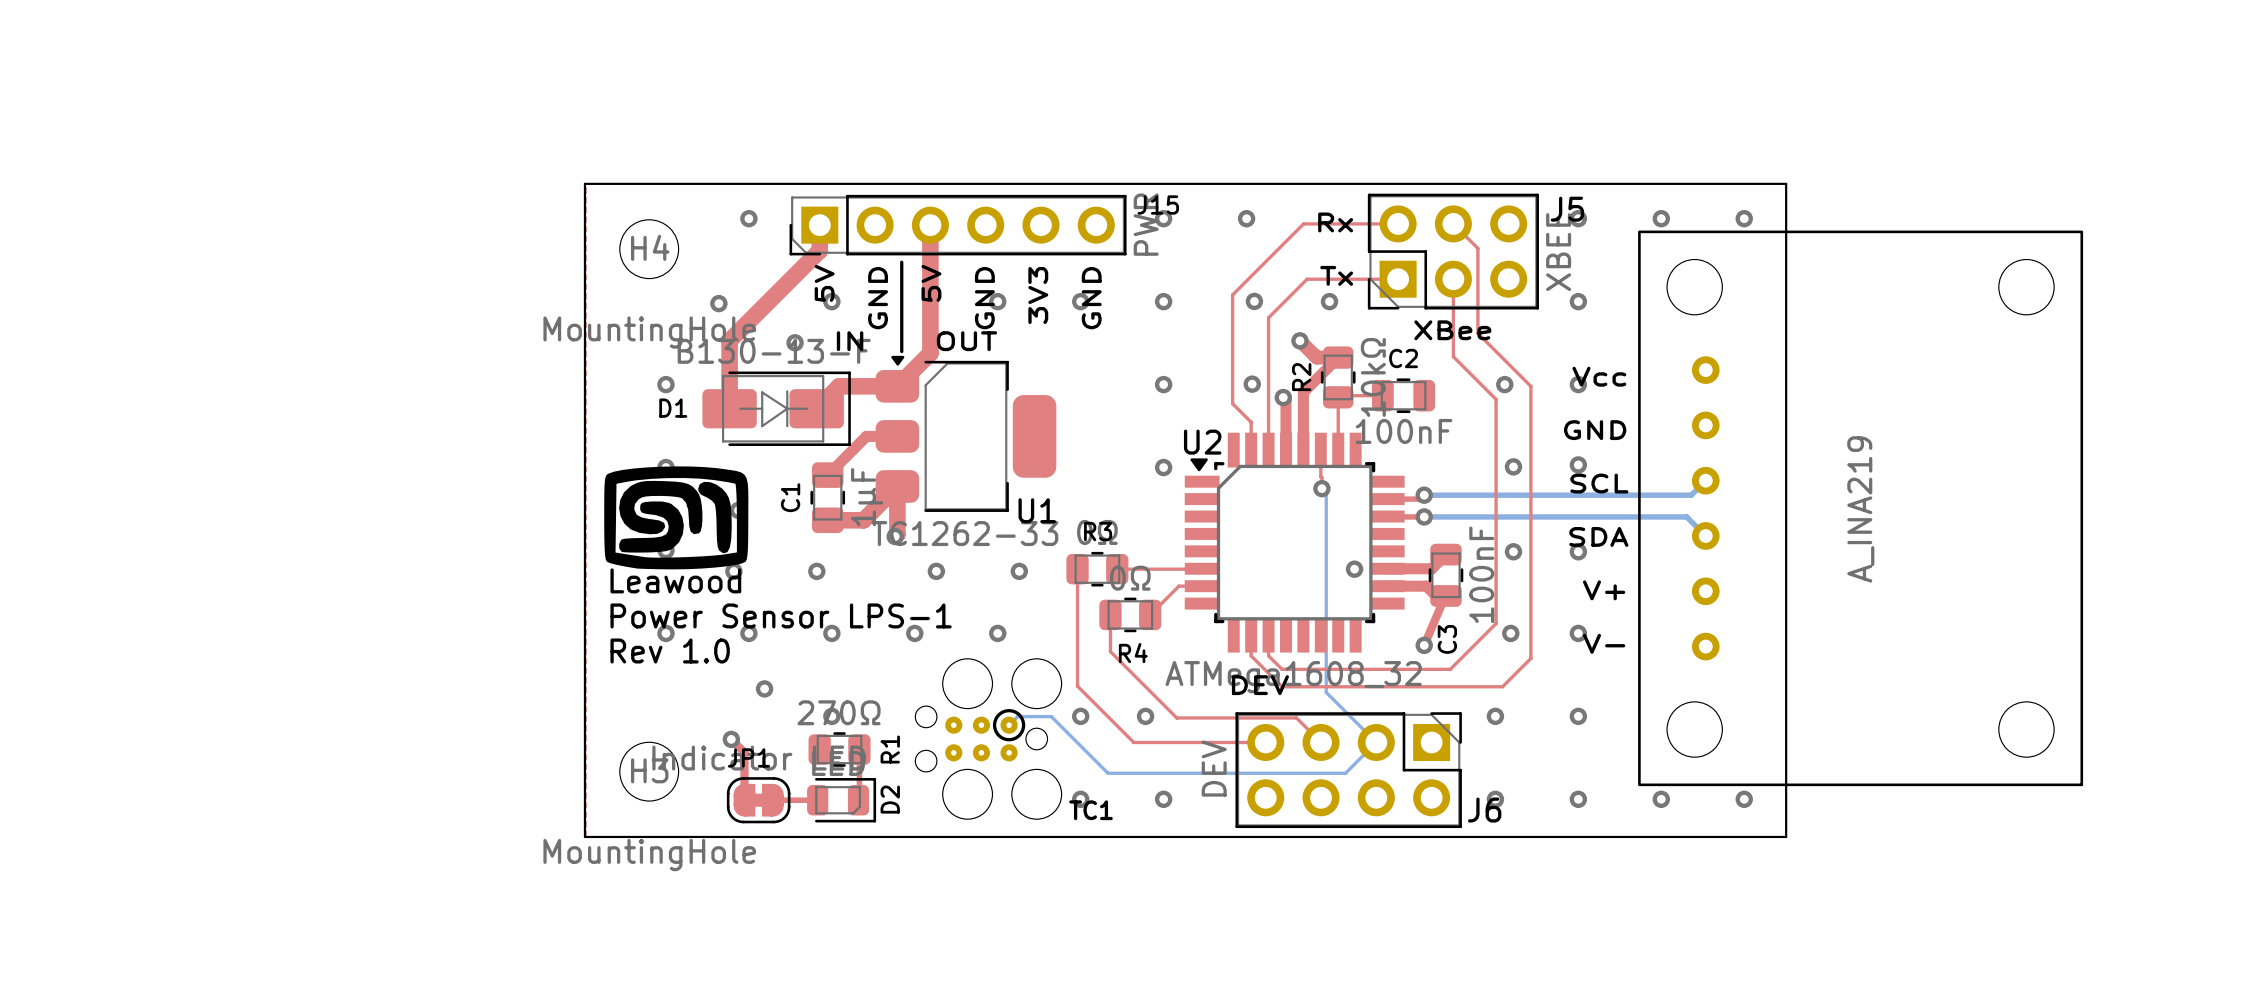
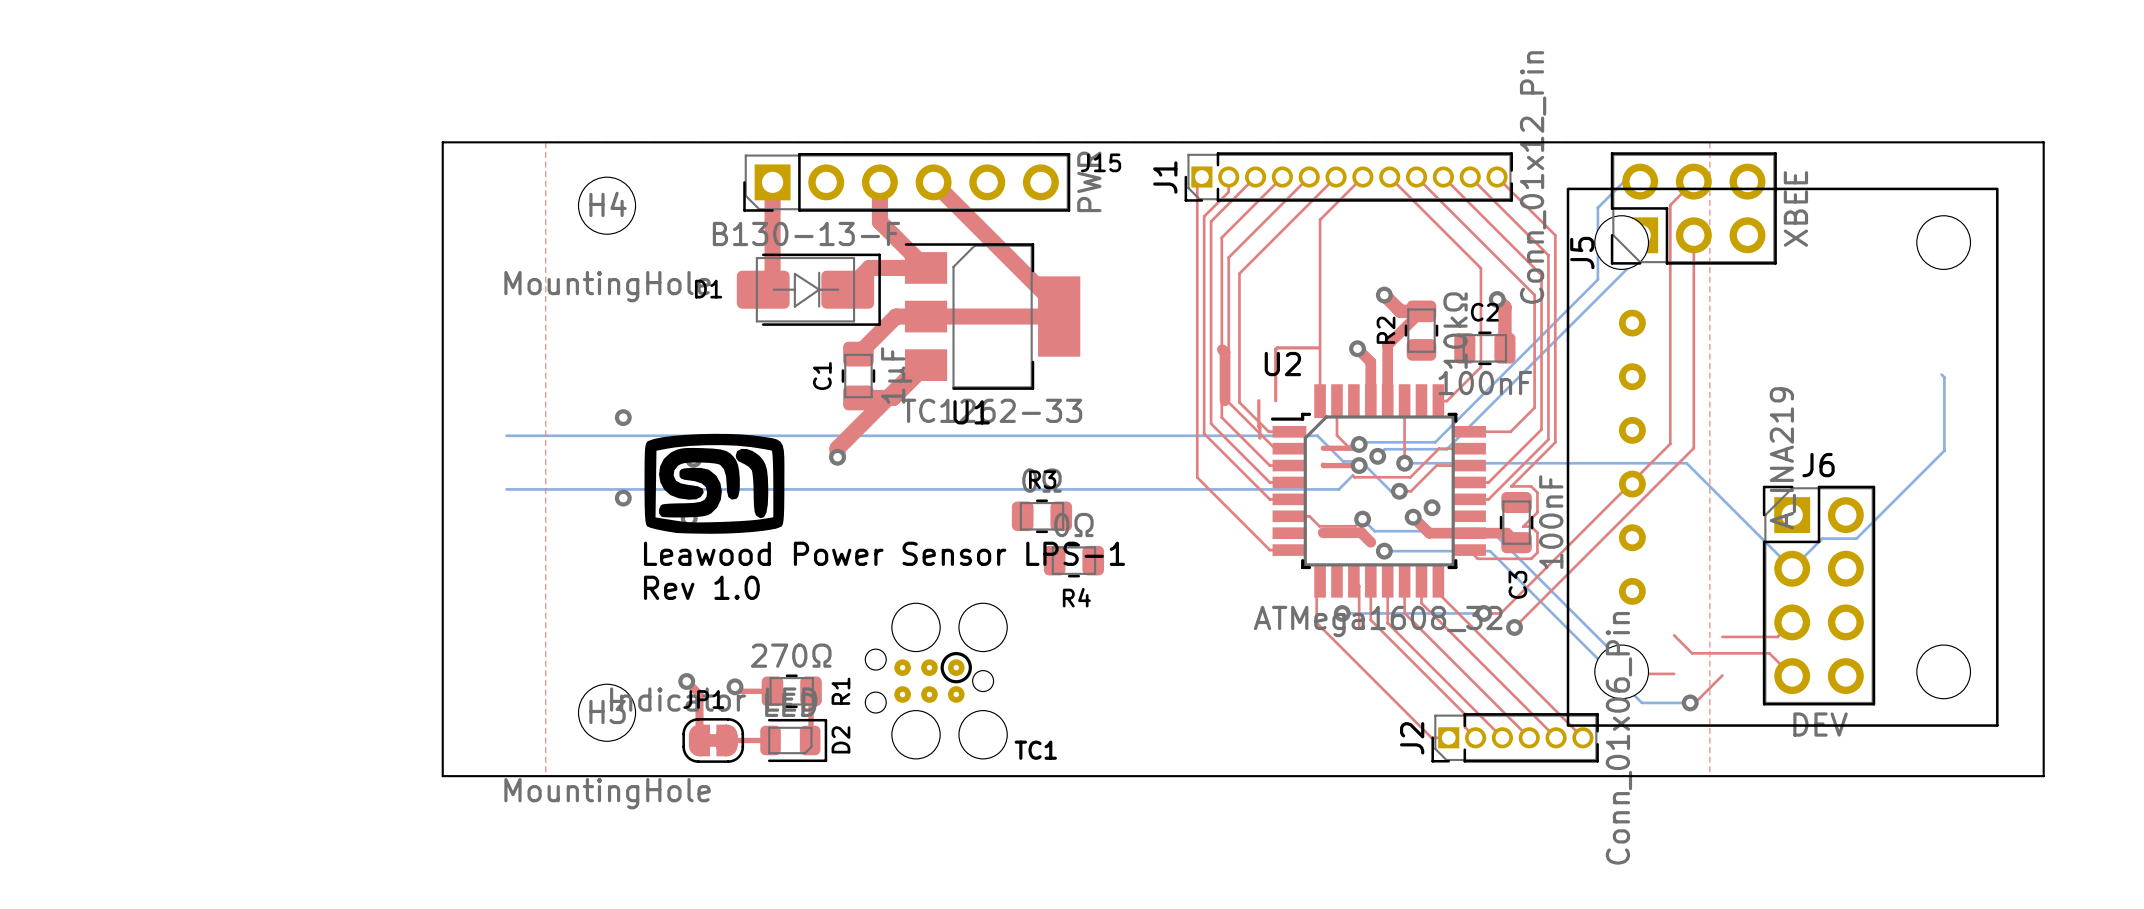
board edge: (584, 183) (584, 836) -> (544, 142) (442, 142) (442, 776) (544, 776)
board edge: (1786, 183) (1786, 836) -> (1710, 142) (2043, 142) (2043, 776) (1710, 776)
J5 name rotation: 0° (1567, 209) -> 90° counterclockwise (1582, 253)
J5 name position: J5 (1567, 209) -> J5 (1582, 253)
via: (748, 218) -> none
via: (1163, 218) -> none
via: (1246, 218) -> none
via: (1578, 218) -> none
via: (1661, 218) -> none
via: (1744, 218) -> none
top track: none -> (1201, 177) (1197, 181) (1197, 477) (1269, 550) (1289, 550)
top track: none -> (1228, 177) (1228, 191) (1204, 216) (1204, 433) (1269, 499) (1289, 499)
top track: none -> (1255, 177) (1211, 221) (1211, 423) (1269, 482) (1289, 482)
top track: none -> (1282, 177) (1221, 237) (1221, 417) (1269, 465) (1289, 465)
top track: none -> (1309, 177) (1228, 257) (1228, 402) (1274, 448) (1289, 448)
top track: none -> (1336, 177) (1239, 273) (1239, 402) (1268, 431) (1289, 431)
J1: none -> Conn_01x12_Pin (1348, 177)
top track: none -> (1362, 177) (1320, 219) (1320, 401)
top track: none -> (1389, 177) (1480, 268) (1480, 367) (1446, 401) (1438, 401)
top track: none -> (1416, 177) (1534, 295) (1534, 407) (1510, 431) (1469, 431)
top track: none -> (1443, 177) (1541, 275) (1541, 429) (1488, 482) (1469, 482)
top track: none -> (1470, 177) (1548, 255) (1548, 439) (1488, 499) (1469, 499)
top track: none -> (1497, 177) (1555, 235) (1555, 442) (1511, 486) (1531, 486) (1537, 492) (1537, 512) (1523, 526) (1531, 526) (1537, 532) (1537, 552) (1531, 558) (1477, 558) (1469, 550)
text: Rx (1335, 222) -> none
top track: (1398, 223) (1303, 223) (1232, 294) (1232, 403) (1251, 422) (1251, 450) -> none
top track: (1453, 223) (1477, 248) (1477, 333) (1530, 386) (1530, 658) (1502, 686) (1282, 686) (1251, 655) (1251, 635) -> none
bottom track: none -> (1640, 181) (1624, 181) (1597, 207) (1597, 279) (1435, 442) (1354, 442) (1348, 447)
top track: none -> (1693, 181) (1670, 205) (1670, 443) (1500, 613) (1483, 613)
top track: none -> (933, 182) (1059, 307) (1059, 316) (896, 316) (858, 354)
top track: (819, 250) (729, 340) (729, 408) -> (772, 207) (772, 280) (763, 289)
J5 position: (1453, 251) -> (1693, 208)
line: (901, 262) (901, 351) -> none
top track: (930, 265) (930, 353) (897, 386) (839, 386) (816, 408) -> (879, 221) (926, 267) (869, 267) (847, 289)
text: Tx (1336, 275) -> none
top track: (1398, 279) (1307, 279) (1268, 317) (1268, 450) -> none
top track: (1453, 279) (1453, 356) (1496, 399) (1496, 623) (1450, 669) (1282, 669) (1268, 655) (1268, 635) -> none
bottom track: none -> (1640, 235) (1640, 255) (1446, 449) (1384, 449) (1377, 456)
top track: none -> (1693, 235) (1693, 448) (1514, 627)
text: 5V (824, 283) -> none
text: 5V (931, 283) -> none
text: 3V3 (1038, 295) -> none
text: GND (878, 298) -> none
text: GND (984, 298) -> none
text: GND (1091, 298) -> none
via: (831, 301) -> none
via: (997, 301) -> none
via: (1080, 301) -> none
via: (1163, 301) -> none
via: (1254, 301) -> none
via: (1329, 301) -> none
via: (1578, 301) -> none
via: (718, 303) -> none
text: XBee (1452, 330) -> none
top track: (1299, 340) (1316, 357) (1338, 357) (1303, 392) (1303, 450) -> (1384, 295) (1400, 311) (1421, 311) (1387, 345) (1387, 401)
via: (1299, 340) -> none
text: IN OUT (916, 341) -> none
via: none -> (1384, 295)
via: (795, 342) -> none
top track: none -> (1497, 299) (1504, 307) (1504, 348)
via: none -> (1497, 299)
U1 footprint: [875, 355, 1057, 512] -> [904, 243, 1081, 390]
text: Vcc (1599, 376) -> none
R2 position: (1338, 377) -> (1421, 330)
via: (665, 384) -> none
via: (1163, 384) -> none
via: (1252, 384) -> none
via: (1504, 384) -> none
via: (1578, 384) -> none
C2 position: (1403, 395) -> (1484, 348)
top track: none -> (1357, 348) (1370, 362) (1370, 401)
via: none -> (1357, 348)
via: (1283, 397) -> none
D1 position: (776, 408) -> (808, 289)
bottom track: none -> (1941, 374) (1944, 377) (1944, 450) (1856, 538) (1822, 538) (1792, 568) (1686, 463) (1404, 463)
text: GND (1595, 430) -> none
U2 footprint: [1184, 432, 1405, 653] -> [1270, 384, 1486, 598]
top track: (897, 436) (866, 436) (827, 475) -> none
top track: none -> (858, 397) (893, 397) (926, 365) (920, 365) (837, 448) (837, 457)
top track: none -> (1336, 401) (1336, 435) (1348, 447)
top track: none -> (1404, 401) (1404, 463)
via: (1578, 464) -> none
via: (1513, 466) -> none
via: (1163, 467) -> none
bottom track: (1705, 480) (1691, 495) (1424, 495) -> none
text: SCL (1599, 483) -> none
bottom track: none -> (506, 435) (1317, 435) (1343, 461) (1361, 461) (1390, 491) (1399, 491)
bottom track: (1321, 488) (1326, 493) (1326, 692) (1376, 742) (1345, 773) (1107, 773) (1051, 716) (1017, 716) (1009, 725) -> none
via: (1321, 488) -> none
C1 position: (827, 497) -> (858, 376)
top track: none -> (1469, 448) (1439, 448) (1410, 477) (1354, 477) (1352, 475)
via: none -> (1377, 456)
U1 name position: U1 (1037, 510) -> U1 (971, 412)
via: none -> (1404, 463)
bottom track: (1424, 516) (1686, 516) (1705, 536) -> none
top track: none -> (1469, 465) (1436, 465) (1410, 491) (1399, 491)
drawing position: (676, 517) -> (714, 483)
top track: (827, 520) (863, 520) (897, 486) (897, 534) (895, 536) -> none
bottom track: none -> (1352, 475) (1338, 489) (506, 489)
via position: (895, 536) -> (837, 457)
text: SDA (1598, 536) -> none
via: none -> (1399, 491)
via position: (1513, 551) -> (1432, 507)
via: (1578, 551) -> none
top track: (1445, 554) (1431, 568) (1387, 568) -> none
top track: (1202, 568) (1117, 569) -> none
top track: (1077, 569) (1077, 686) (1133, 742) (1265, 742) -> none
top track: none -> (1289, 516) (1309, 516) (1319, 526) (1355, 526) (1362, 519)
via: (1354, 569) -> none
top track: none -> (1413, 517) (1429, 533) (1507, 533) (1516, 542)
via: none -> (1413, 517)
via: (816, 571) -> none
via: (936, 571) -> none
via: (1019, 571) -> none
bottom track: none -> (1362, 519) (1374, 531) (1491, 531) (1636, 676)
via: none -> (1362, 519)
C3 position: (1445, 575) -> (1516, 522)
text: Leawood (675, 580) -> none
top track: (1202, 586) (1178, 586) (1150, 614) -> none
text: V+ (1604, 590) -> none
top track: (1445, 595) (1424, 645) -> none
bottom track: none -> (1384, 551) (1490, 551) (1641, 702) (1690, 702)
via: none -> (1384, 551)
top track: (1110, 614) (1110, 651) (1176, 717) (1296, 717) (1321, 742) -> none
text: Power Sensor LPS-1 (781, 615) -> Leawood Power Sensor LPS-1 (884, 553)
via: (665, 633) -> none
via: (748, 633) -> none
via: (831, 633) -> none
via: (914, 633) -> none
via: (997, 633) -> none
via: (1510, 633) -> none
via: (1578, 633) -> none
top track: none -> (1320, 580) (1316, 584) (1316, 622) (1431, 737) (1448, 737)
top track: none -> (1353, 580) (1359, 586) (1359, 628)
top track: none -> (1370, 580) (1370, 620) (1465, 714) (1465, 727) (1475, 737)
top track: none -> (1387, 580) (1387, 623) (1502, 737)
top track: none -> (1404, 580) (1404, 613) (1529, 737)
top track: none -> (1421, 580) (1421, 603) (1556, 737)
top track: none -> (1438, 580) (1438, 593) (1582, 737)
text: V- (1604, 643) -> none
via: (1424, 645) -> none
text position: Rev 1.0 (670, 651) -> Rev 1.0 (701, 587)
bottom track: none -> (1342, 613) (1483, 613)
via: none -> (1342, 613)
via: none -> (1483, 613)
top track: none -> (1792, 622) (1777, 636) (1722, 636)
via: none -> (1514, 627)
text: DEV (1260, 685) -> none
via: (764, 688) -> none
top track: none -> (1674, 635) (1692, 653) (1769, 653) (1792, 676)
via: (831, 716) -> none
via: (1080, 716) -> none
via: (1145, 716) -> none
via: (1495, 716) -> none
via: (1578, 716) -> none
top track: none -> (1674, 673) (1638, 673) (1636, 676)
top track: none -> (1722, 675) (1694, 702) (1690, 702)
top track: none -> (735, 686) (739, 691) (772, 691)
via: none -> (735, 686)
via: none -> (1690, 702)
J6 rotation: 0° (1348, 770) -> 90° counterclockwise (1819, 595)
J6 position: (1348, 770) -> (1819, 595)
J2: none -> Conn_01x06_Pin (1515, 737)
via: (1080, 799) -> none
via: (1163, 799) -> none
via: (1495, 799) -> none
via: (1578, 799) -> none
via: (1661, 799) -> none
via: (1744, 799) -> none

